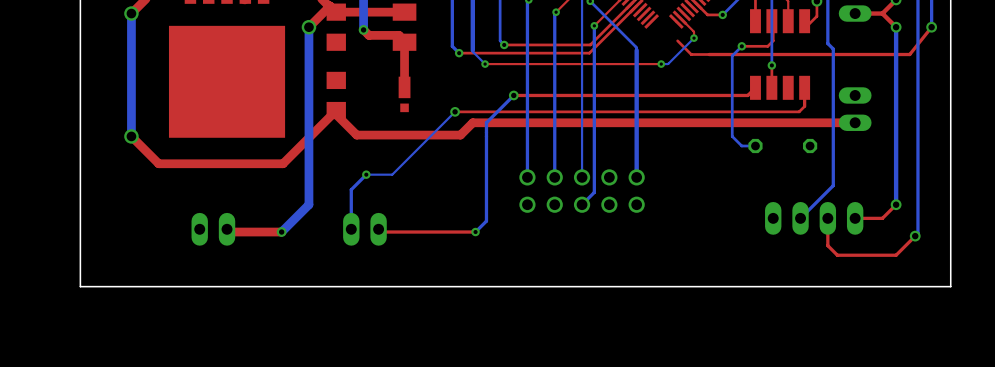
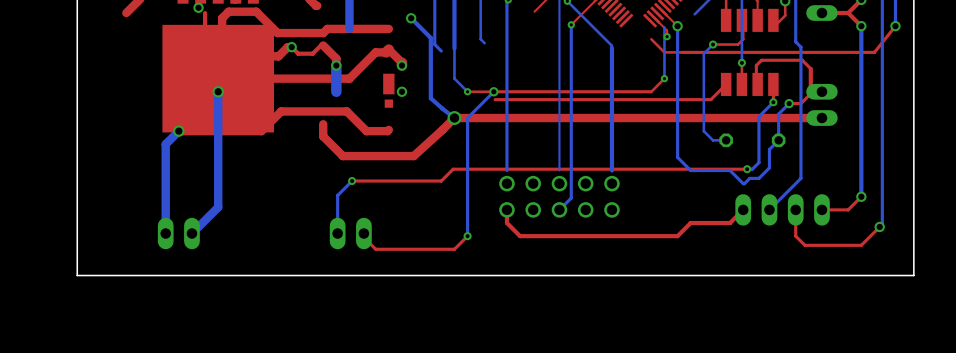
top track: (632, 2) (590, 44) (504, 44) -> none
top track: (695, 2) (707, 14) (722, 14) -> none
top track: (636, 6) (589, 53) (459, 53) -> none
via: none -> (198, 7)
top track: none -> (661, 9) (677, 26)
top track: (404, 12) (336, 12) (330, 6) (308, 27) -> none
bottom track: (556, 12) (554, 177) -> none
via: (556, 12) -> none
bottom track: (131, 13) (131, 136) -> none
via: (131, 13) -> none
top track: none -> (205, 13) (205, 31)
via: (722, 14) -> none
bottom track: none -> (411, 18) (430, 37) (430, 98) (454, 118)
via: none -> (411, 18)
bottom track: (308, 27) (308, 204) (281, 232) -> none
via: (308, 27) -> none
part: (336, 27) -> none
part: (404, 27) -> none
bottom track: none -> (677, 26) (677, 157) (690, 170) (730, 170) (743, 183) (749, 178) (758, 178) (769, 167) (769, 149) (778, 140) (778, 114) (789, 103)
via: none -> (677, 26)
bottom track: none -> (664, 27) (664, 78)
top track: (363, 29) (369, 35) (399, 35) (404, 40) (404, 87) -> none
via: (363, 29) -> none
top track: none -> (388, 28) (327, 28) (323, 33) (277, 33) (256, 11) (228, 11) (222, 18) (222, 55) (218, 60) (218, 91)
top track: none -> (187, 31) (187, 66) (199, 78) (349, 78) (375, 52) (386, 52) (388, 49) (401, 62) (401, 65)
top track: none -> (240, 31) (264, 56) (278, 56) (287, 47) (291, 47) (298, 53) (312, 53) (323, 45) (336, 58) (336, 65)
bottom track: (694, 38) (668, 63) (661, 64) -> none
via: (504, 44) -> none
via: none -> (291, 47)
bottom track: (472, 50) (485, 64) -> (454, 48) (454, 78) (467, 91)
via: (459, 53) -> none
via position: (485, 64) -> (467, 91)
top track: (661, 64) (485, 64) -> none
via position: (661, 64) -> (664, 78)
bottom track: none -> (336, 65) (336, 91)
via: none -> (336, 65)
via: none -> (401, 65)
top track: none -> (757, 84) (756, 65) (761, 60) (802, 60) (810, 68) (810, 89) (812, 91)
bottom track: none -> (218, 91) (218, 207) (191, 233)
via: none -> (218, 91)
part: (336, 95) -> none
via: none -> (401, 91)
top track: none -> (493, 91) (467, 91)
top track: (747, 95) (677, 95) -> (664, 78) (651, 91)
top track: none -> (718, 91) (710, 99) (495, 99)
top track: none -> (812, 91) (800, 103) (789, 103)
top track: (804, 106) (799, 111) (455, 111) -> none
bottom track: none -> (773, 102) (758, 116) (758, 162) (752, 169) (747, 169)
via: none -> (773, 102)
via: none -> (789, 103)
bottom track: (455, 111) (392, 174) (366, 174) (351, 189) (351, 203) -> (352, 181) (337, 195)
via: (455, 111) -> none
via: none -> (454, 118)
top track: none -> (388, 129) (366, 131) (346, 111) (281, 111) (261, 131) (178, 131)
top track: (460, 135) (356, 135) (336, 114) (336, 110) (283, 163) (158, 163) (131, 136) -> (442, 129) (413, 156) (342, 156) (323, 136) (323, 124)
via: (131, 136) -> none
bottom track: none -> (178, 131) (165, 144) (165, 233)
via: none -> (178, 131)
via position: (366, 174) -> (352, 181)
top track: none -> (747, 169) (453, 169) (441, 181) (352, 181)
via: none -> (747, 169)
part position: (582, 191) -> (559, 196)
bottom track: (594, 192) (582, 204) -> (571, 184) (571, 198) (559, 209)
top track: none -> (743, 209) (730, 223) (690, 223) (677, 236) (520, 236) (506, 223) (506, 209)
bottom track: (486, 221) (475, 232) -> (467, 212) (467, 236)
part position: (213, 229) -> (178, 233)
top track: (227, 229) (229, 232) (281, 232) -> none
part position: (364, 229) -> (350, 233)
top track: (378, 229) (381, 232) (475, 232) -> none
via: (281, 232) -> none
via position: (475, 232) -> (467, 236)
top track: none -> (363, 233) (363, 237) (375, 249) (454, 249) (467, 236)

